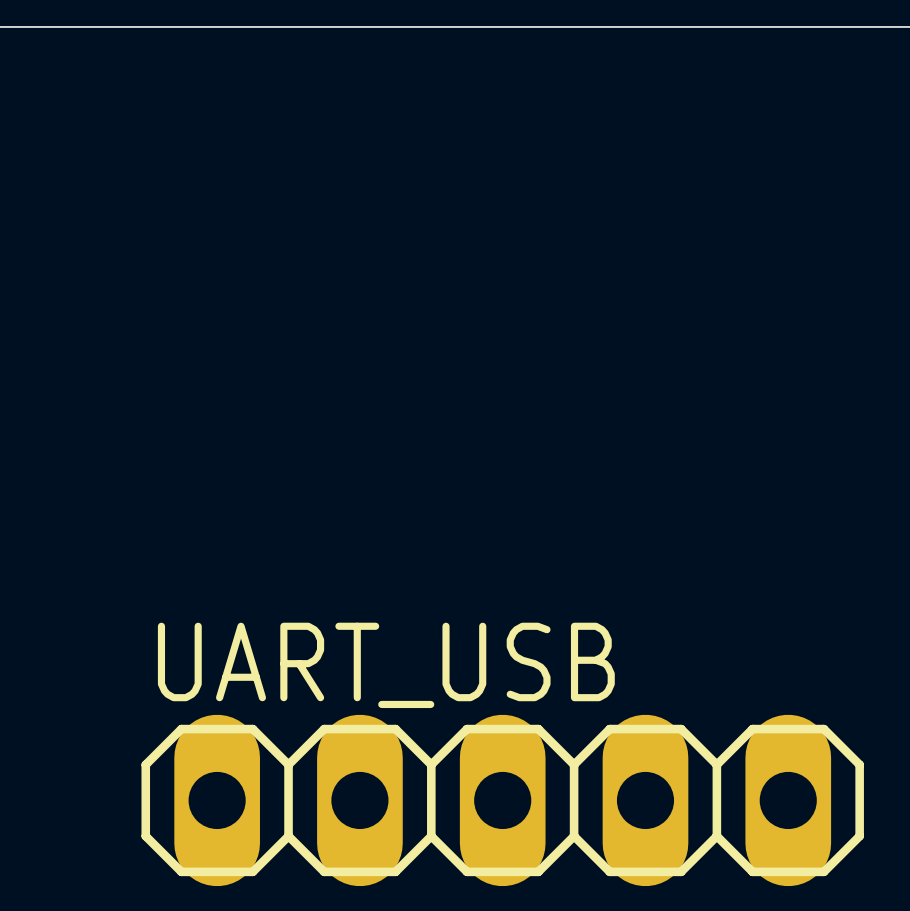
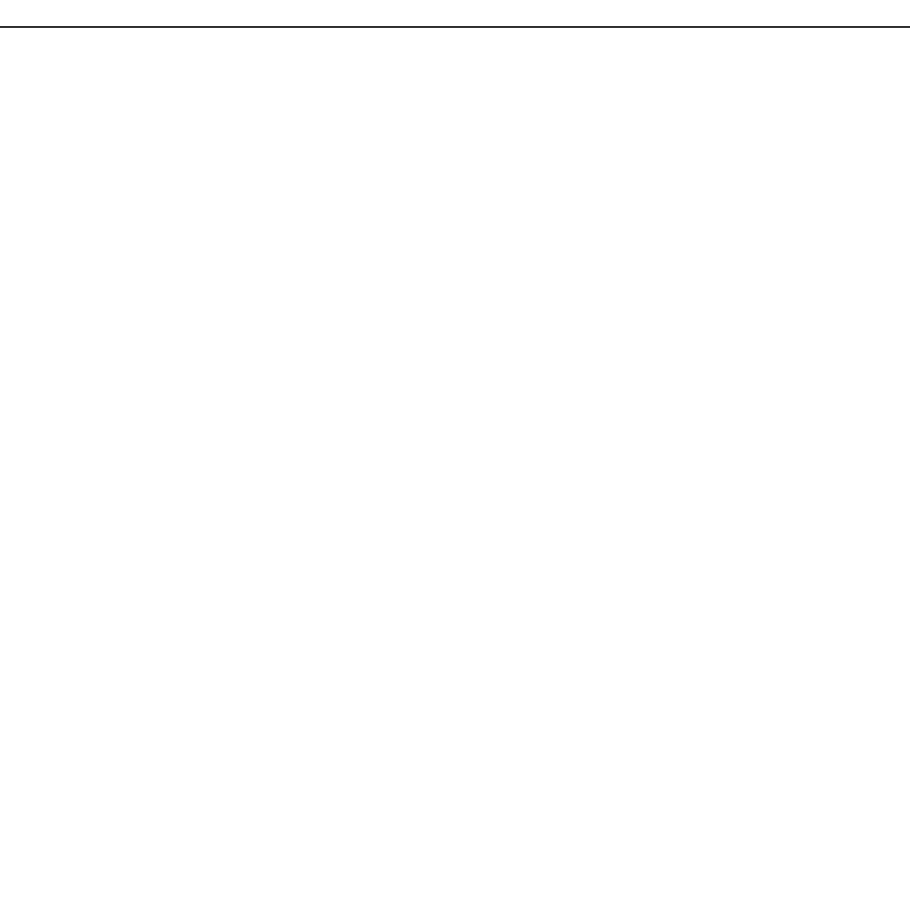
UART_USB: (502, 800) -> none

